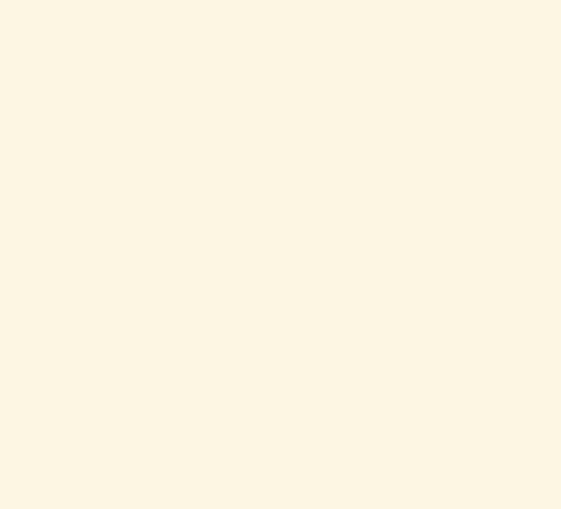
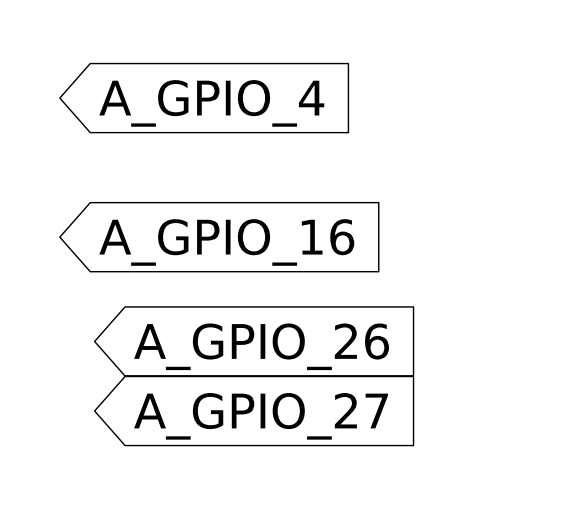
global label: none -> A_GPIO_4 (211, 103)
global label: none -> A_GPIO_16 (226, 242)
global label: none -> A_GPIO_26 (261, 346)
global label: none -> A_GPIO_27 (261, 416)

